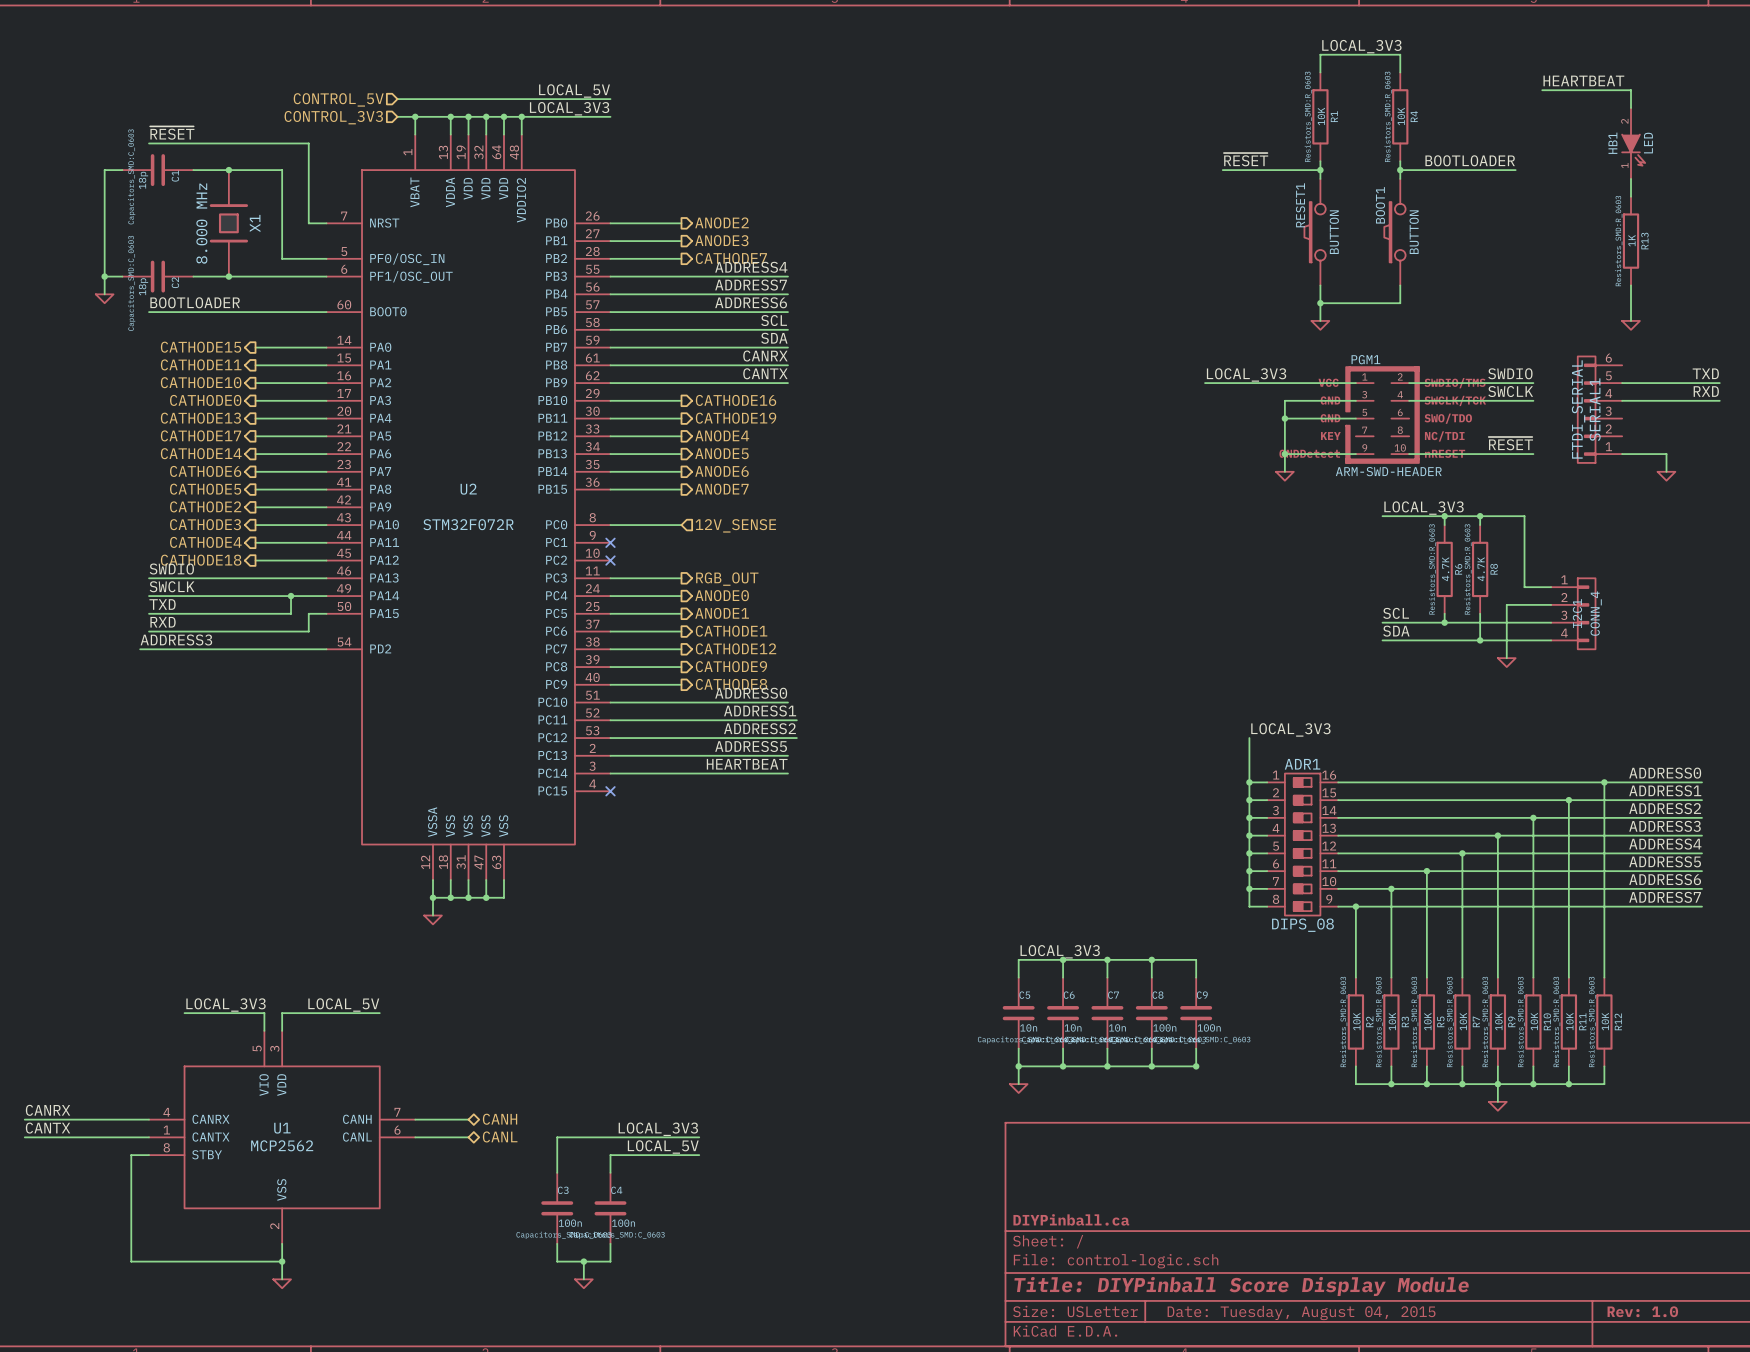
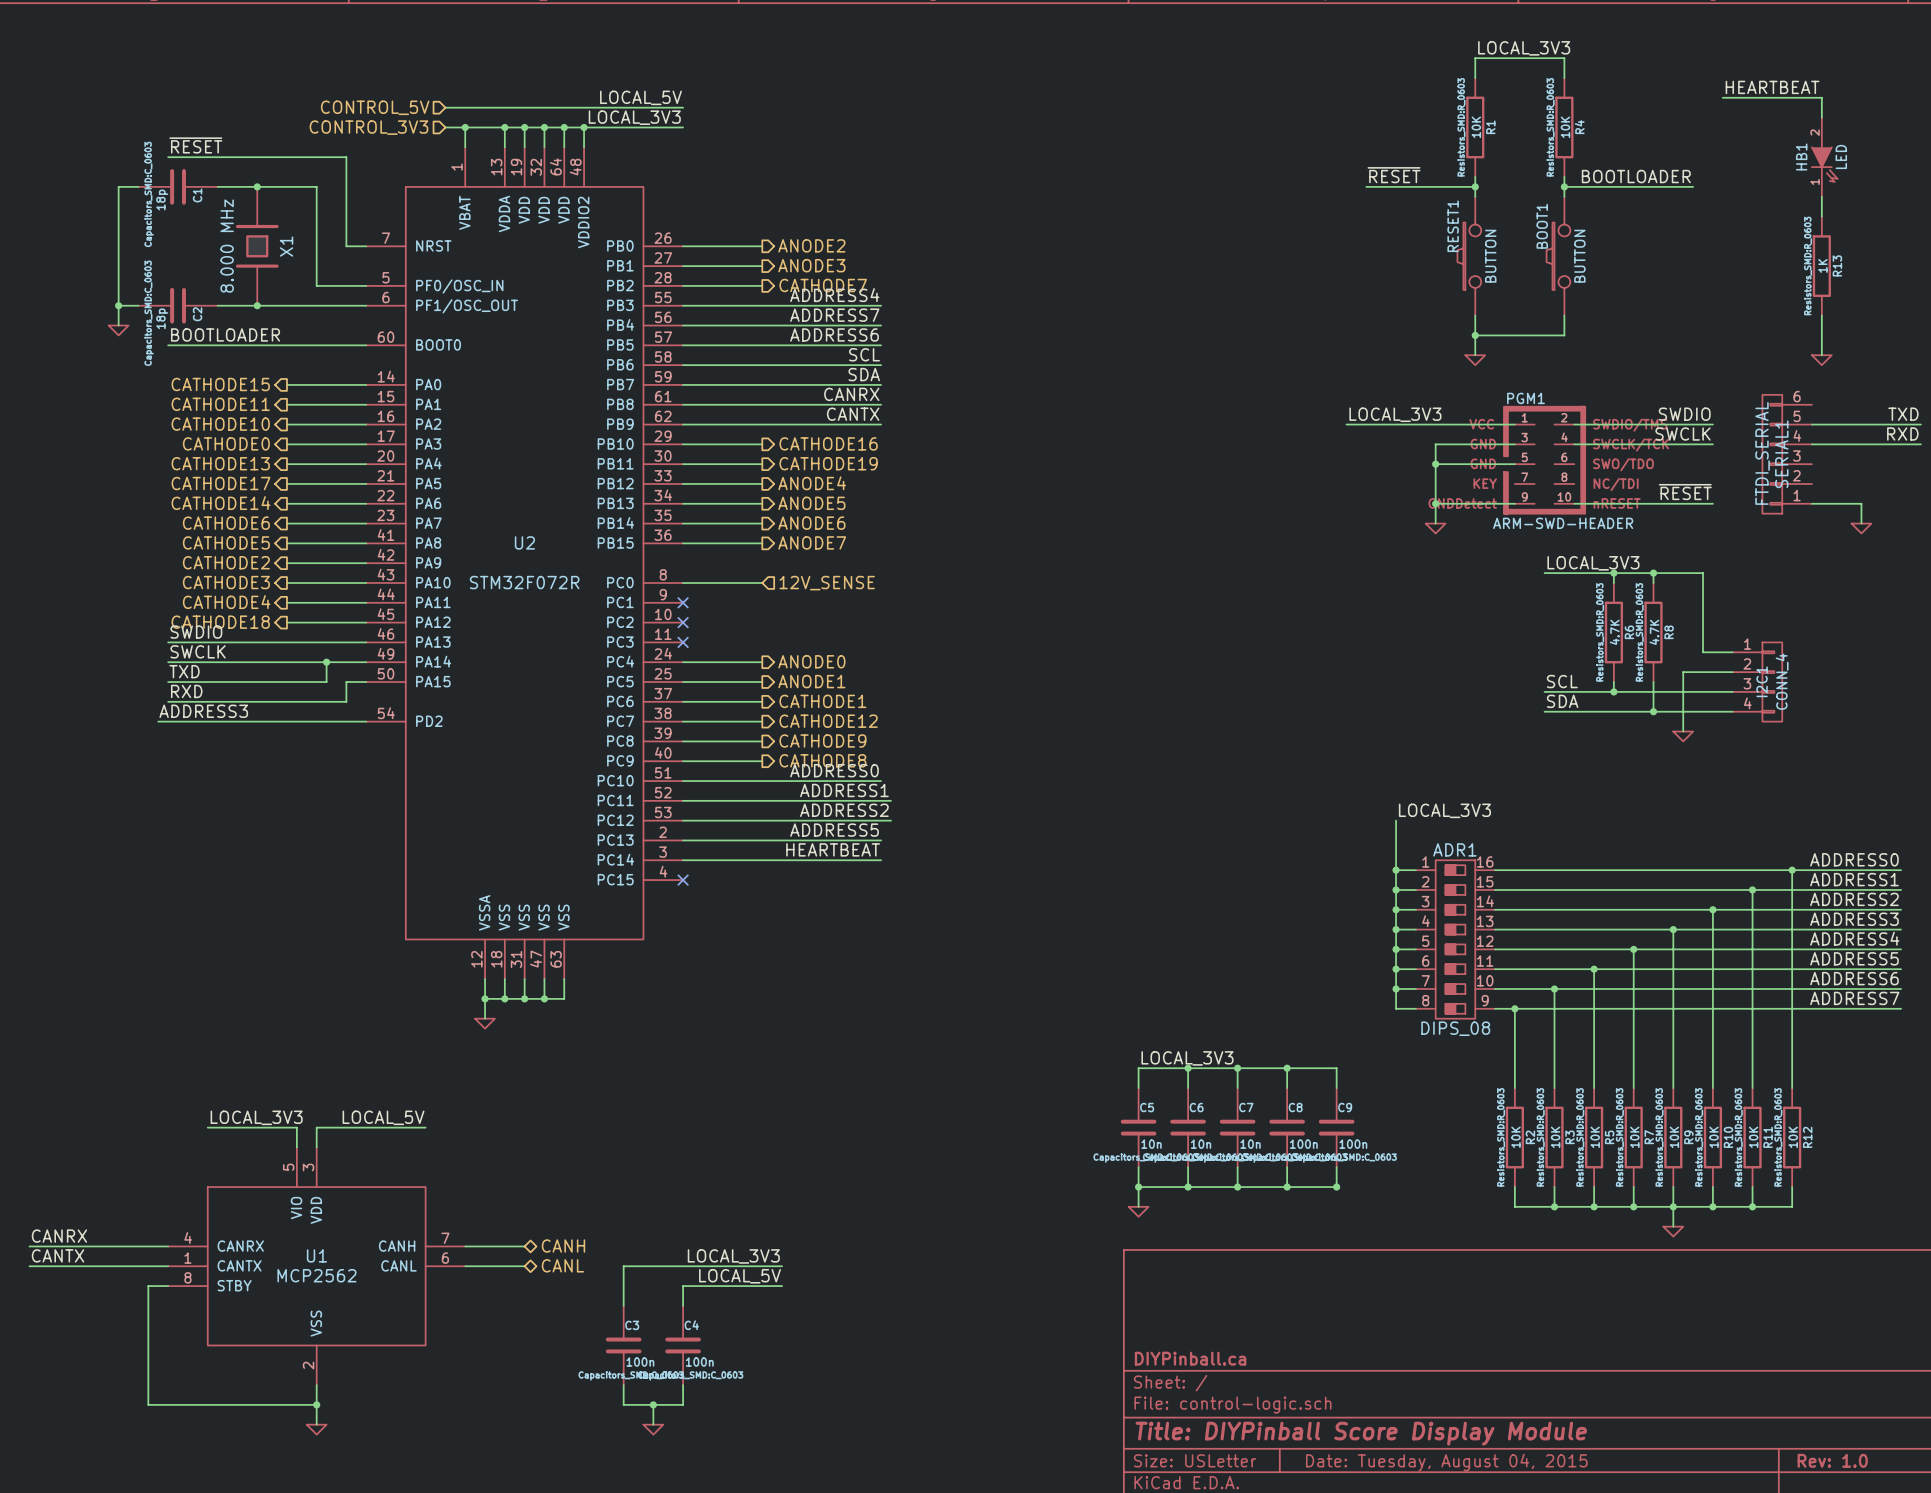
wire: (610, 578) (681, 578) -> none
no-connect mark: none -> (683, 642)
hierarchical label: RGB_OUT (727, 579) -> none

